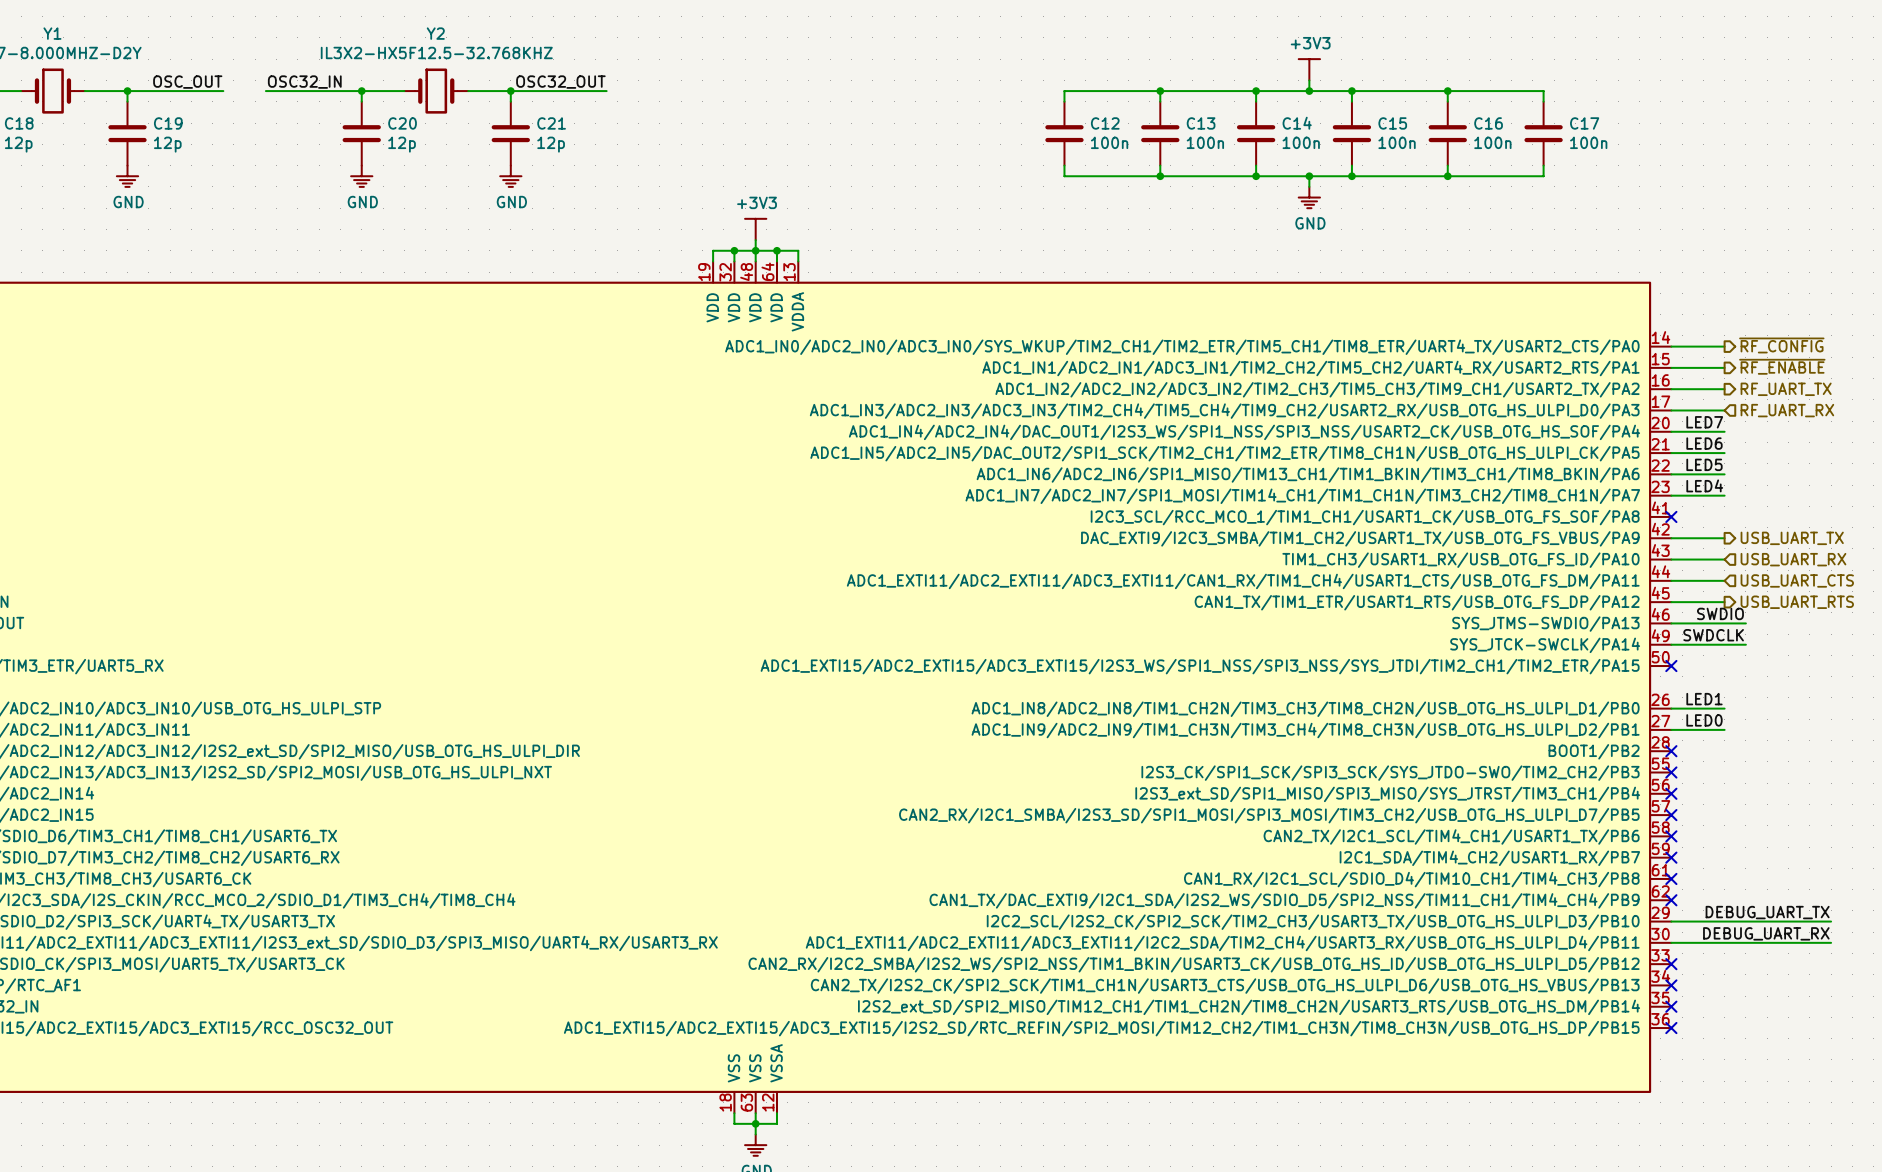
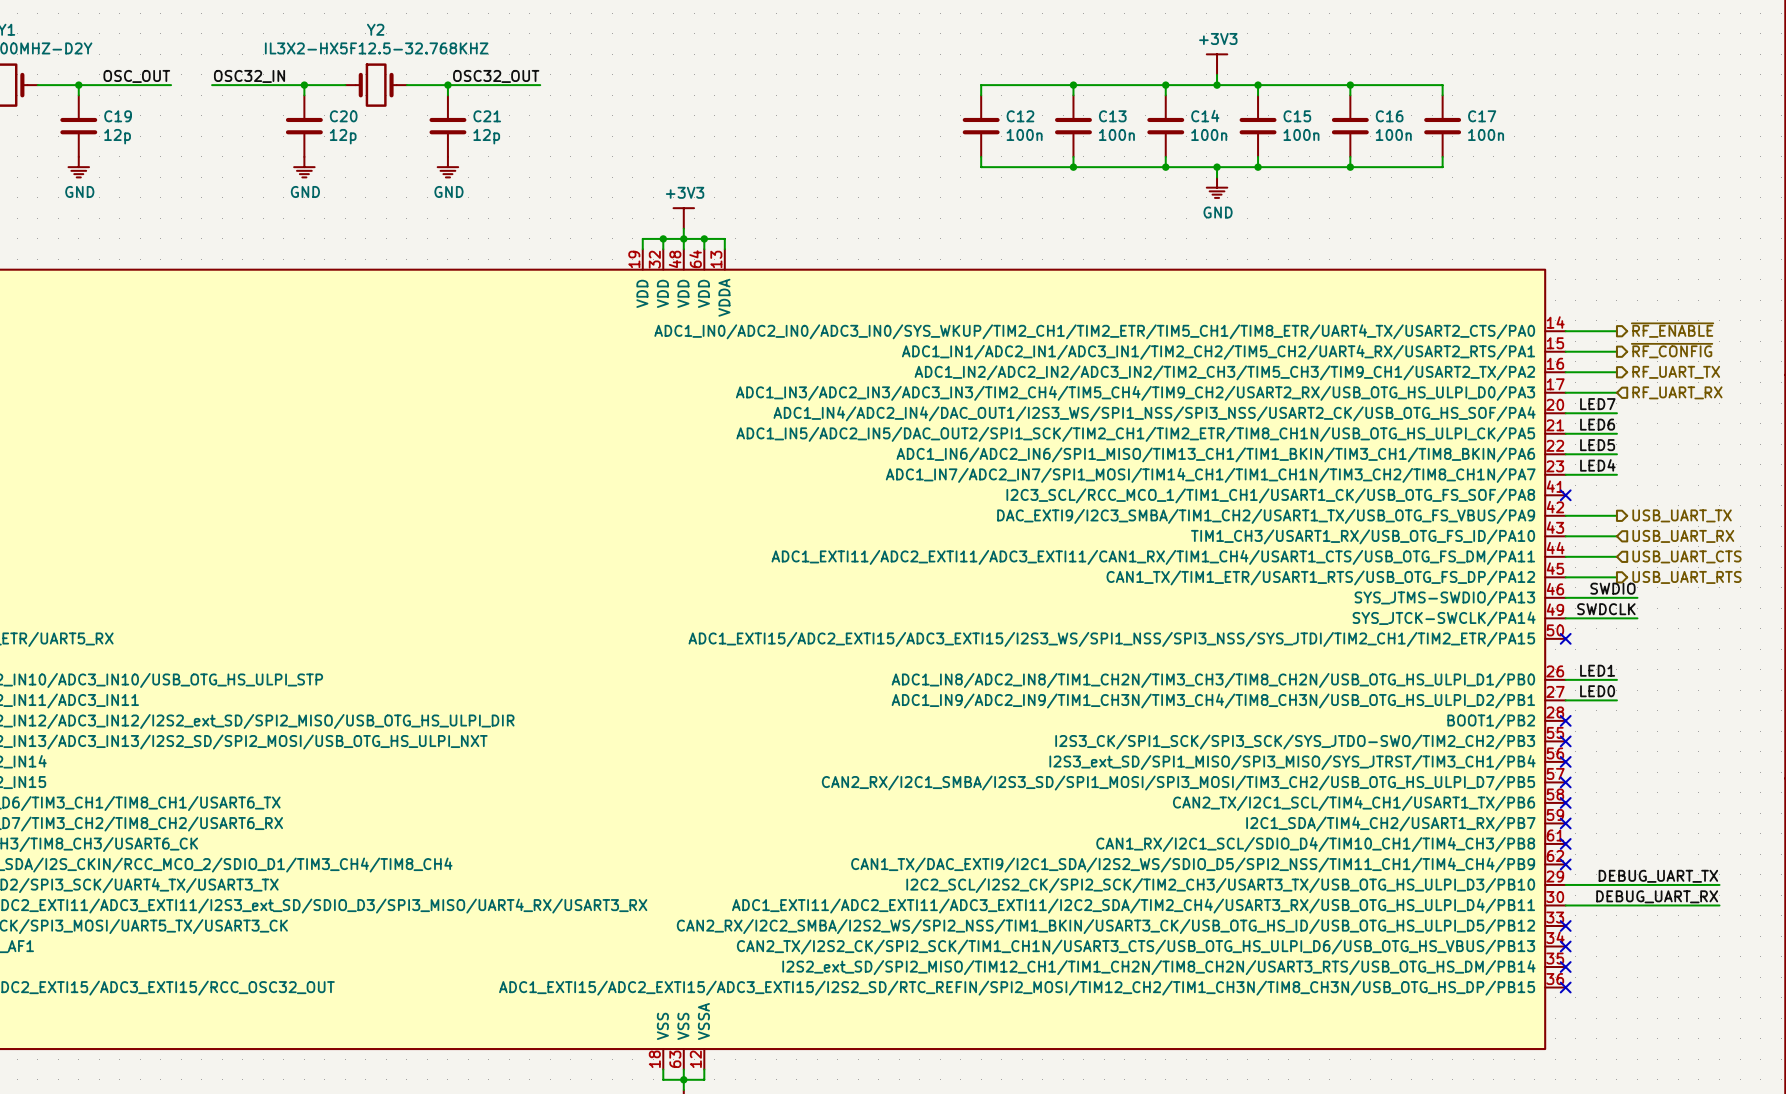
hierarchical label: ~{RF_CONFIG} (1781, 345) -> ~{RF_ENABLE} (1672, 330)
hierarchical label: ~{RF_ENABLE} (1782, 366) -> ~{RF_CONFIG} (1672, 350)

